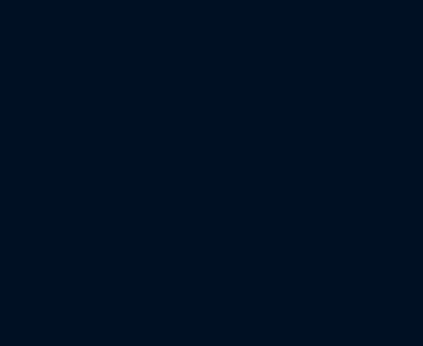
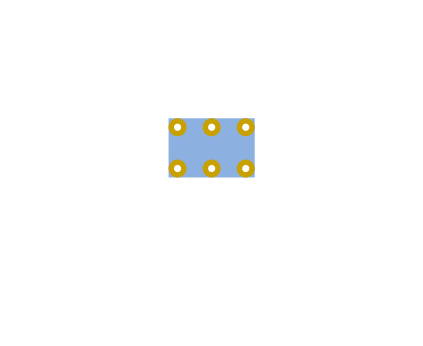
part: none -> (211, 147)

